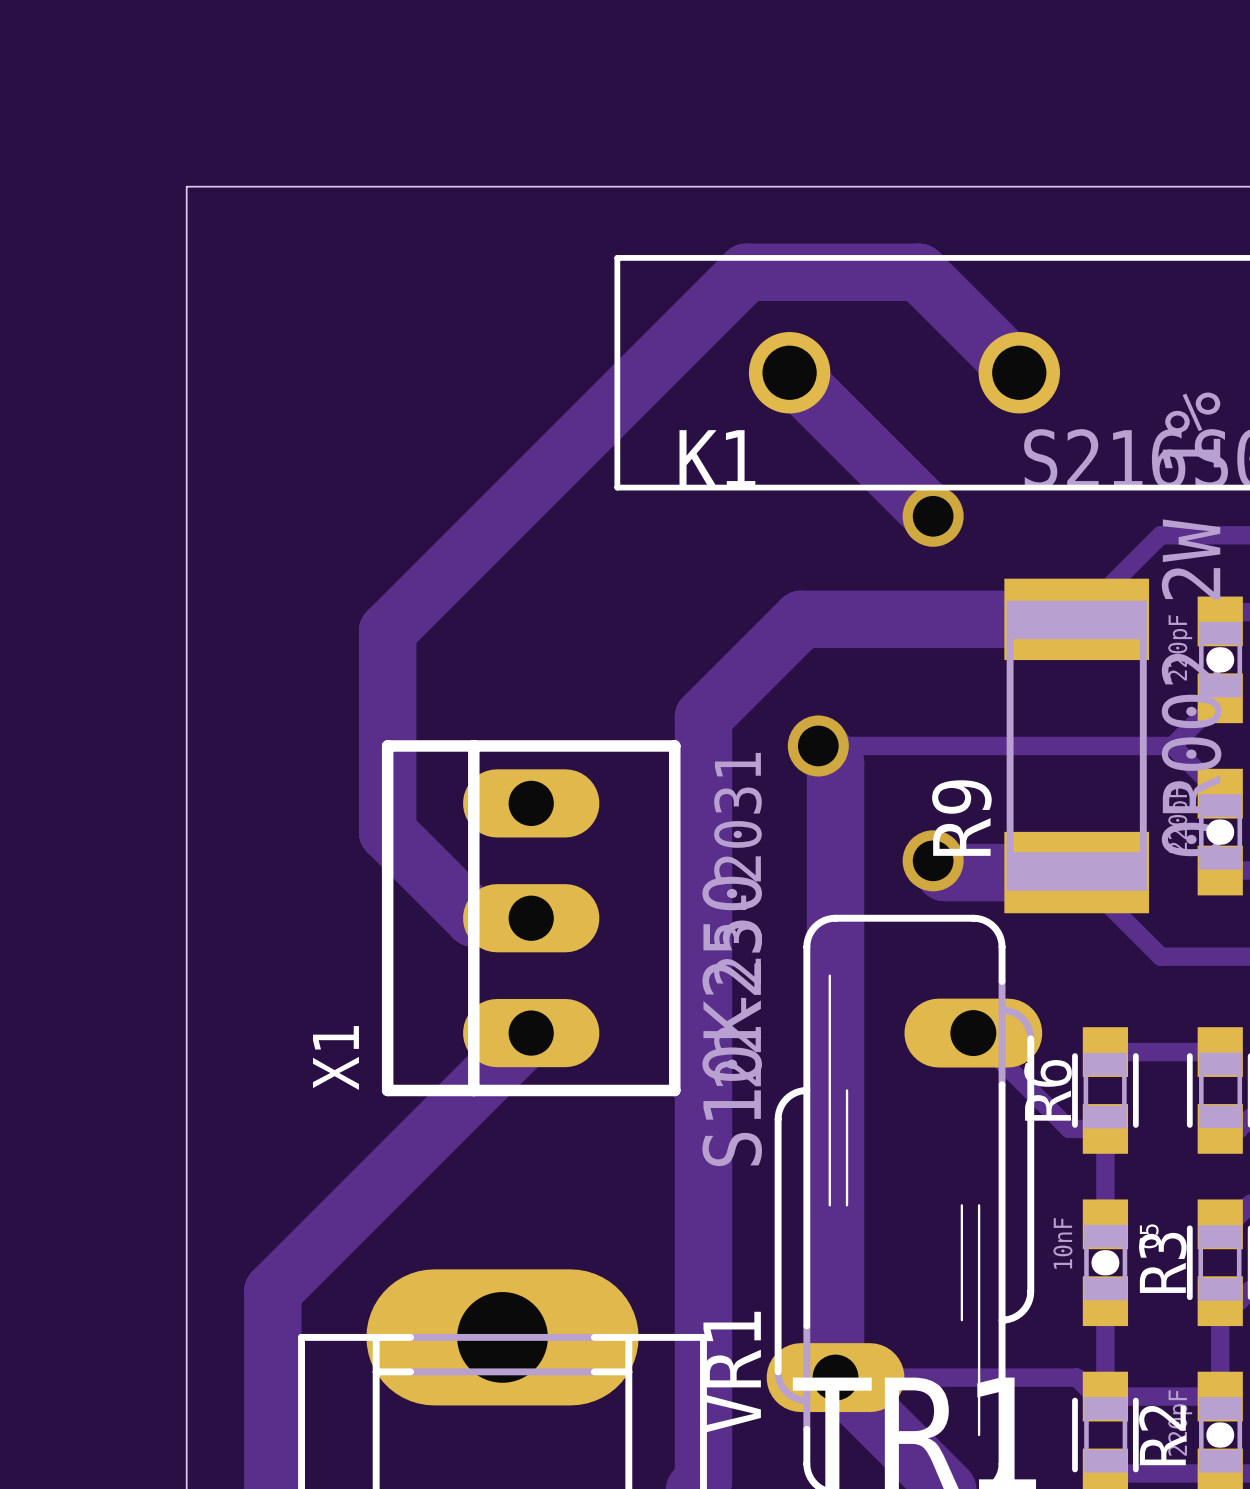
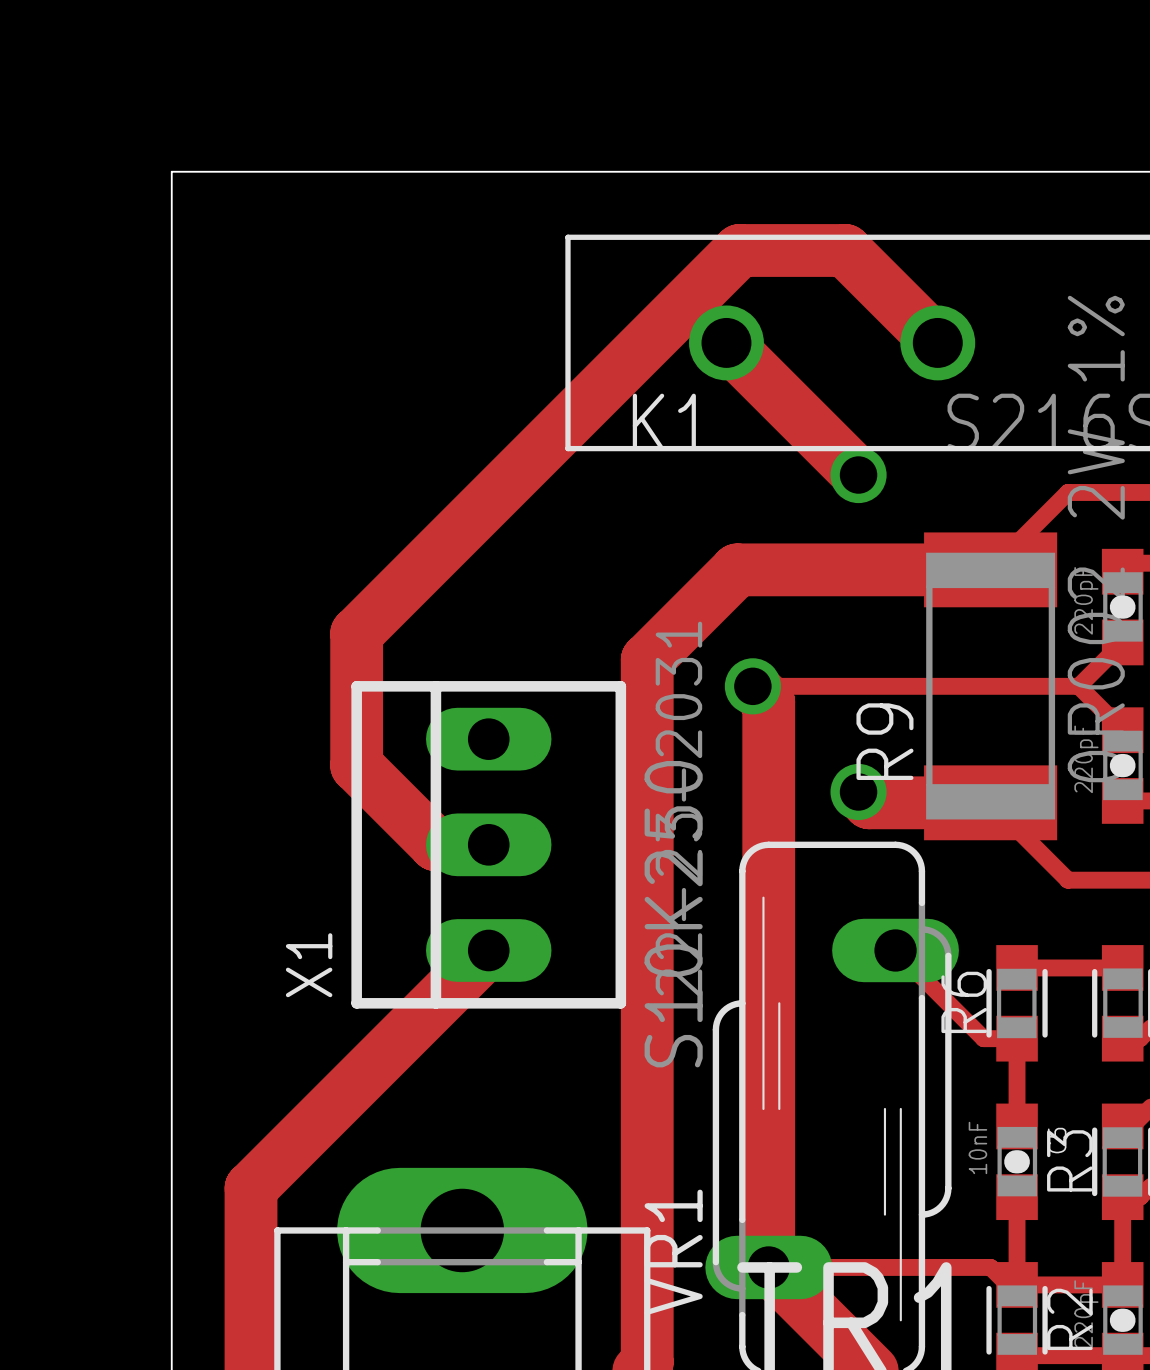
track: (803, 272) (746, 272) (387, 631) (387, 688) -> (739, 250) (356, 633)

